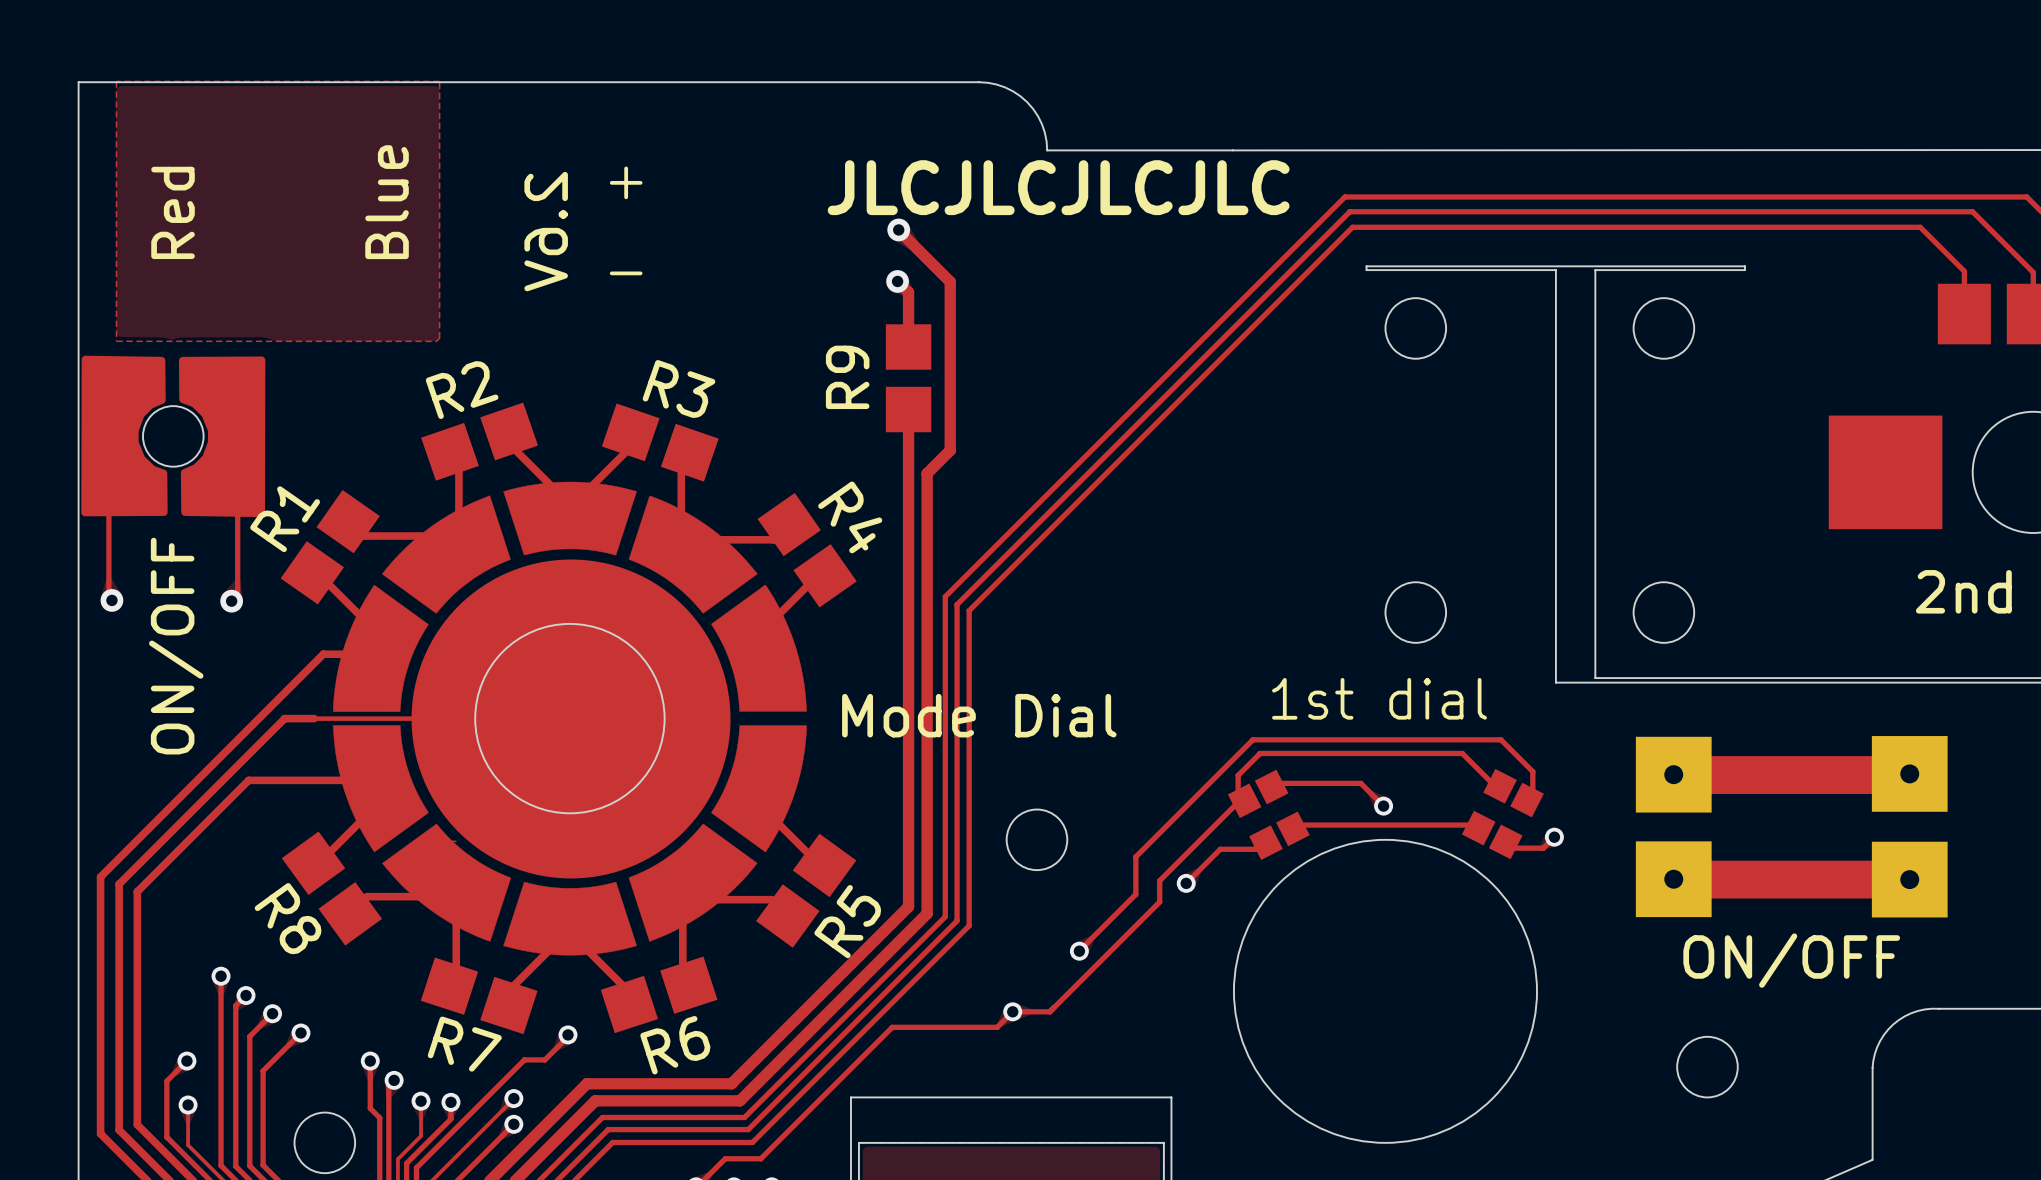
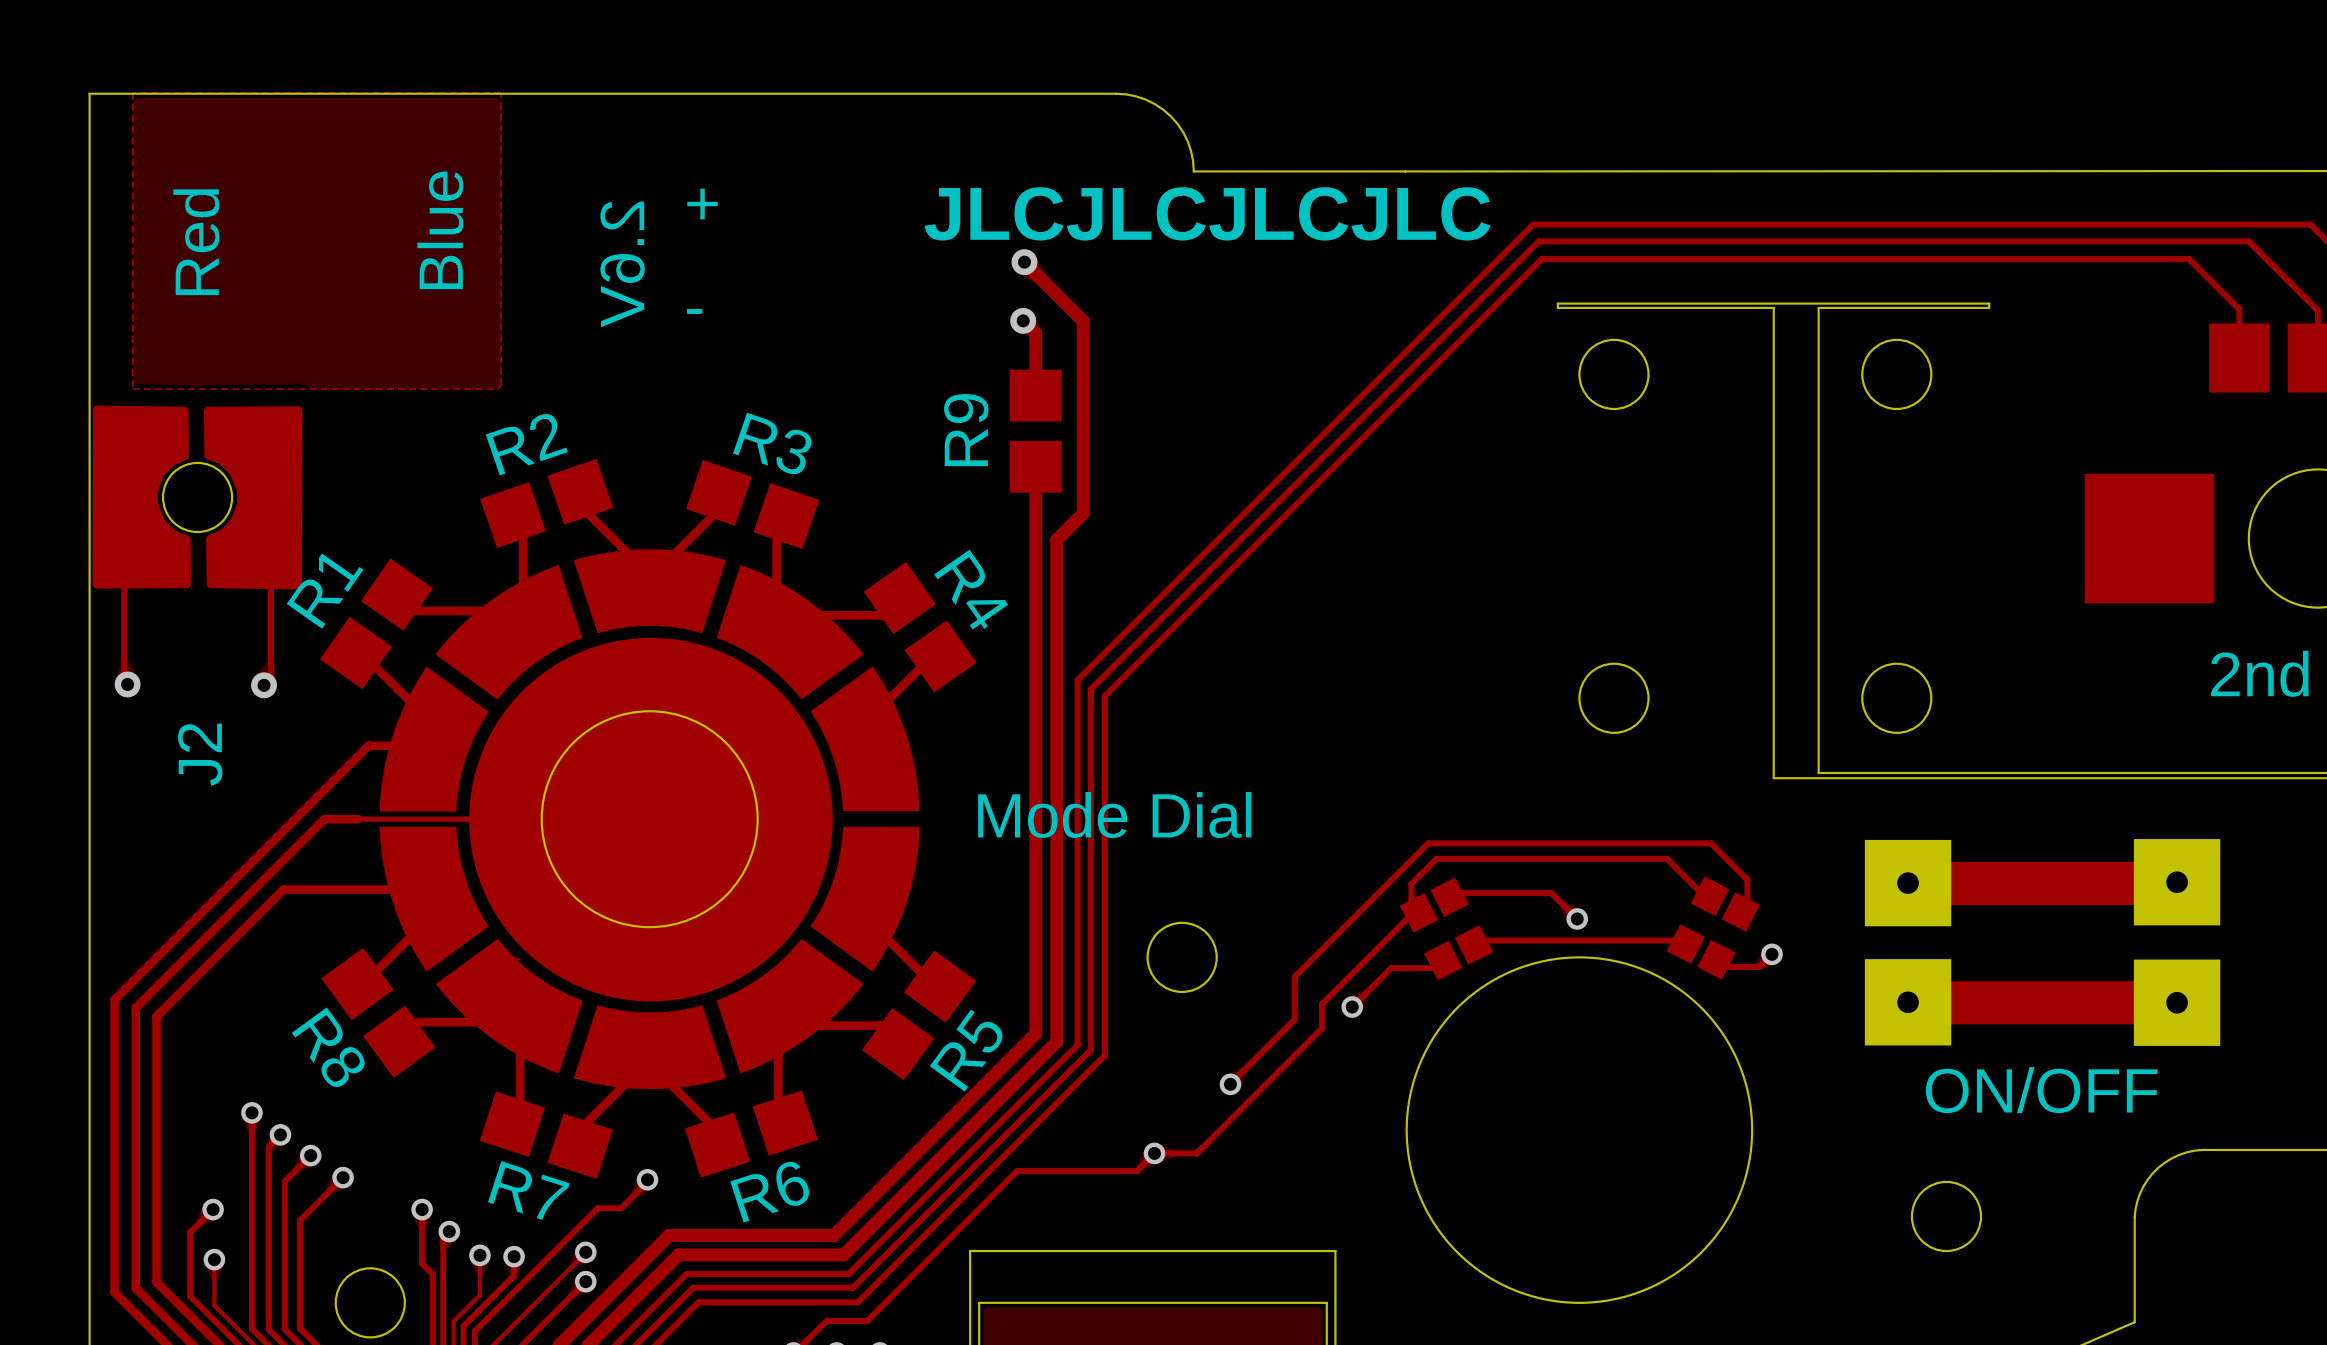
J2 value: ON/OFF (176, 646) -> none
J2 name: none -> J2 (200, 754)
text: 1st dial (1379, 698) -> none

